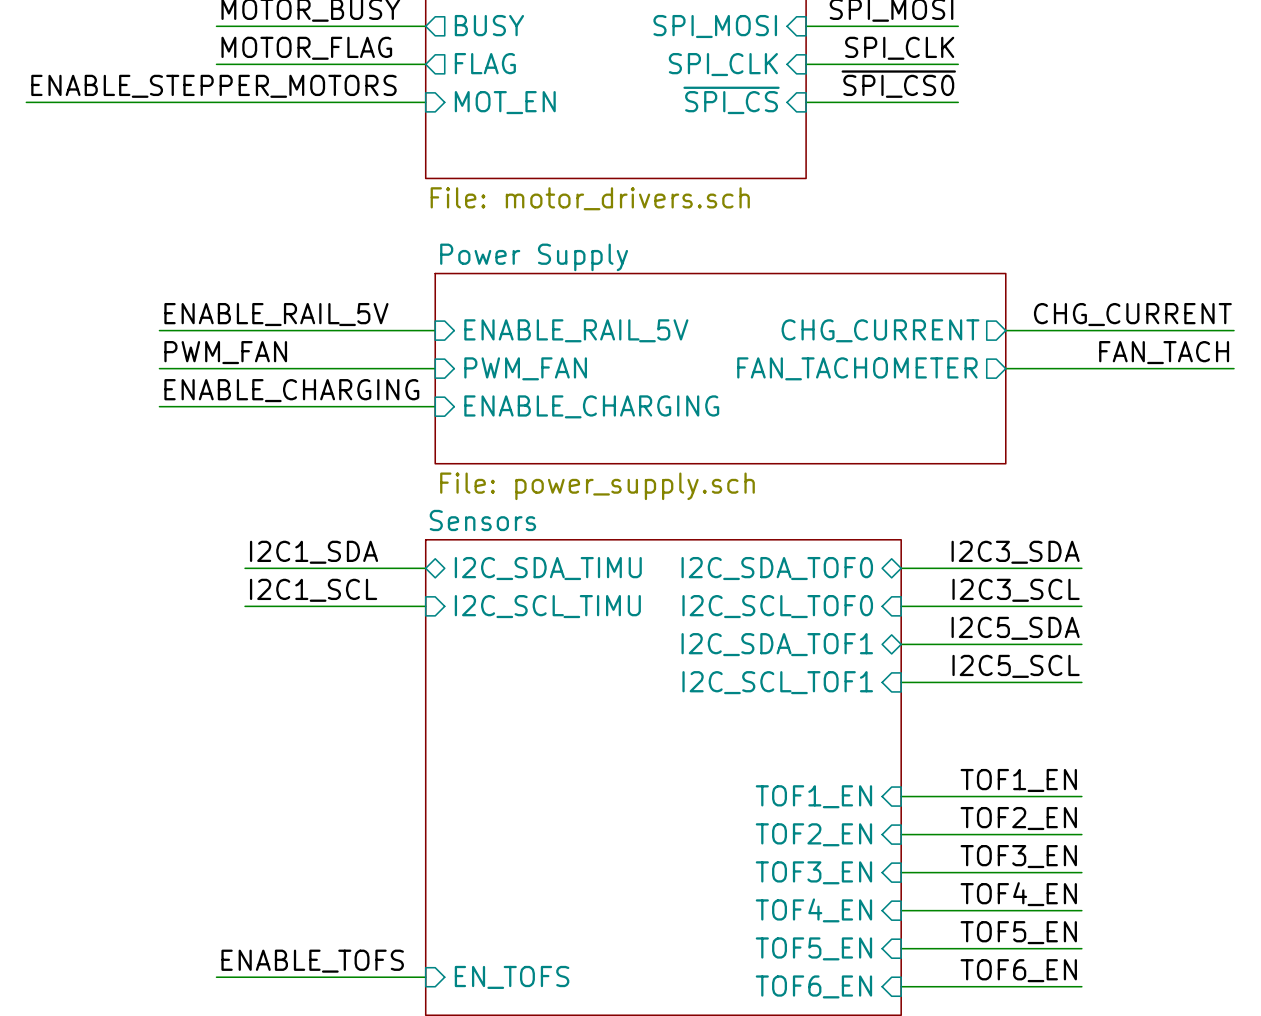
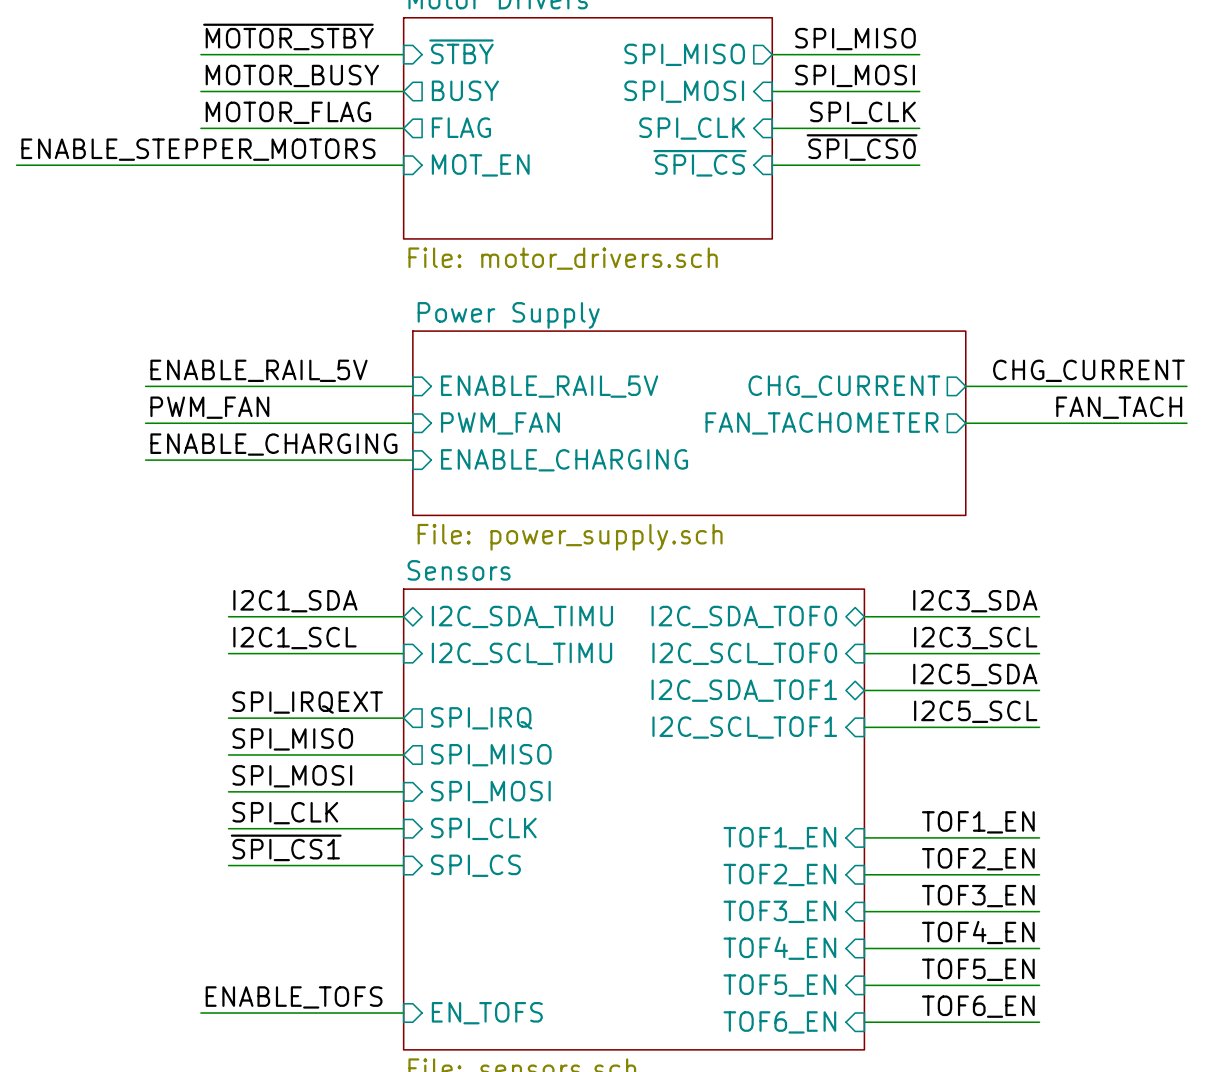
label: none -> SPI_IRQEXT (307, 702)
wire: none -> (228, 718) (403, 718)
sheet pin: none -> SPI_IRQ (481, 718)
label: none -> SPI_MISO (292, 739)
wire: none -> (228, 754) (403, 754)
sheet pin: none -> SPI_MISO (491, 755)
label: none -> SPI_MOSI (292, 776)
wire: none -> (228, 791) (403, 791)
sheet pin: none -> SPI_MOSI (490, 792)
label: none -> SPI_CLK (285, 813)
wire: none -> (228, 828) (403, 828)
sheet pin: none -> SPI_CLK (483, 828)
label: none -> ~{SPI_CS1} (286, 847)
wire: none -> (228, 865) (403, 865)
sheet pin: none -> SPI_CS (475, 865)

